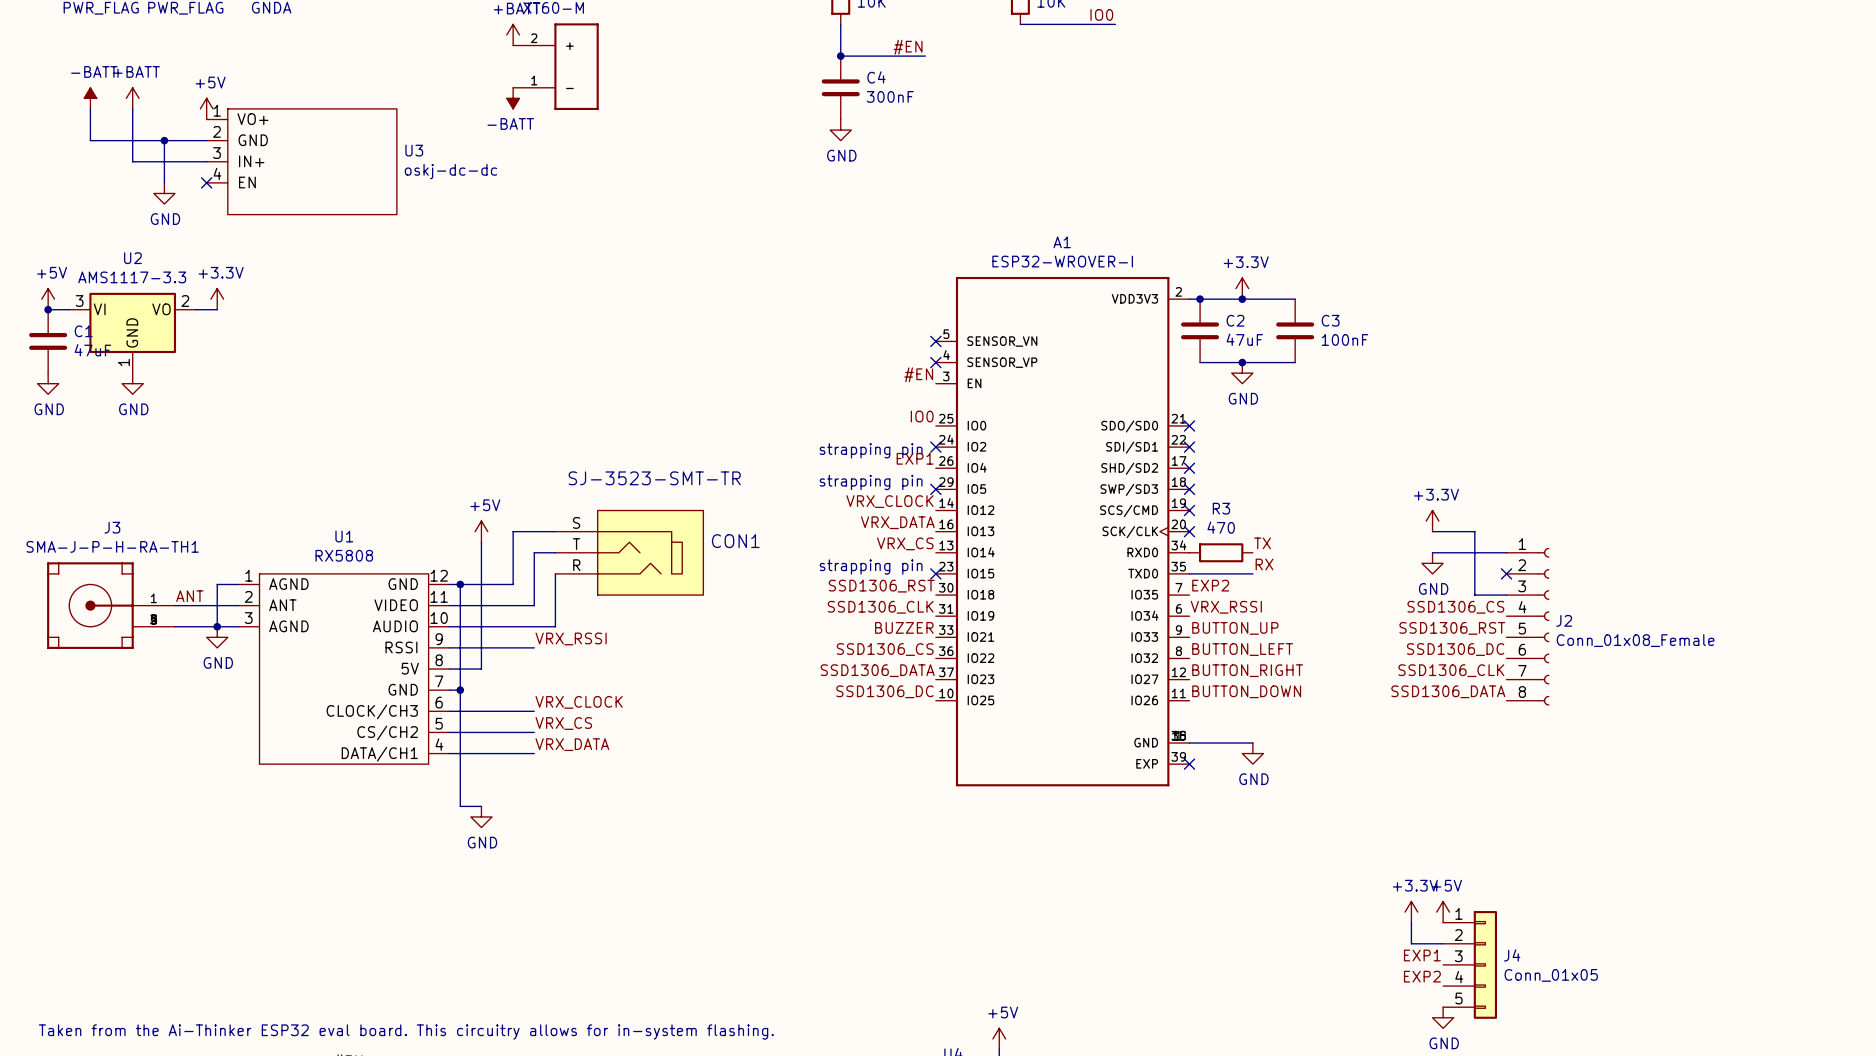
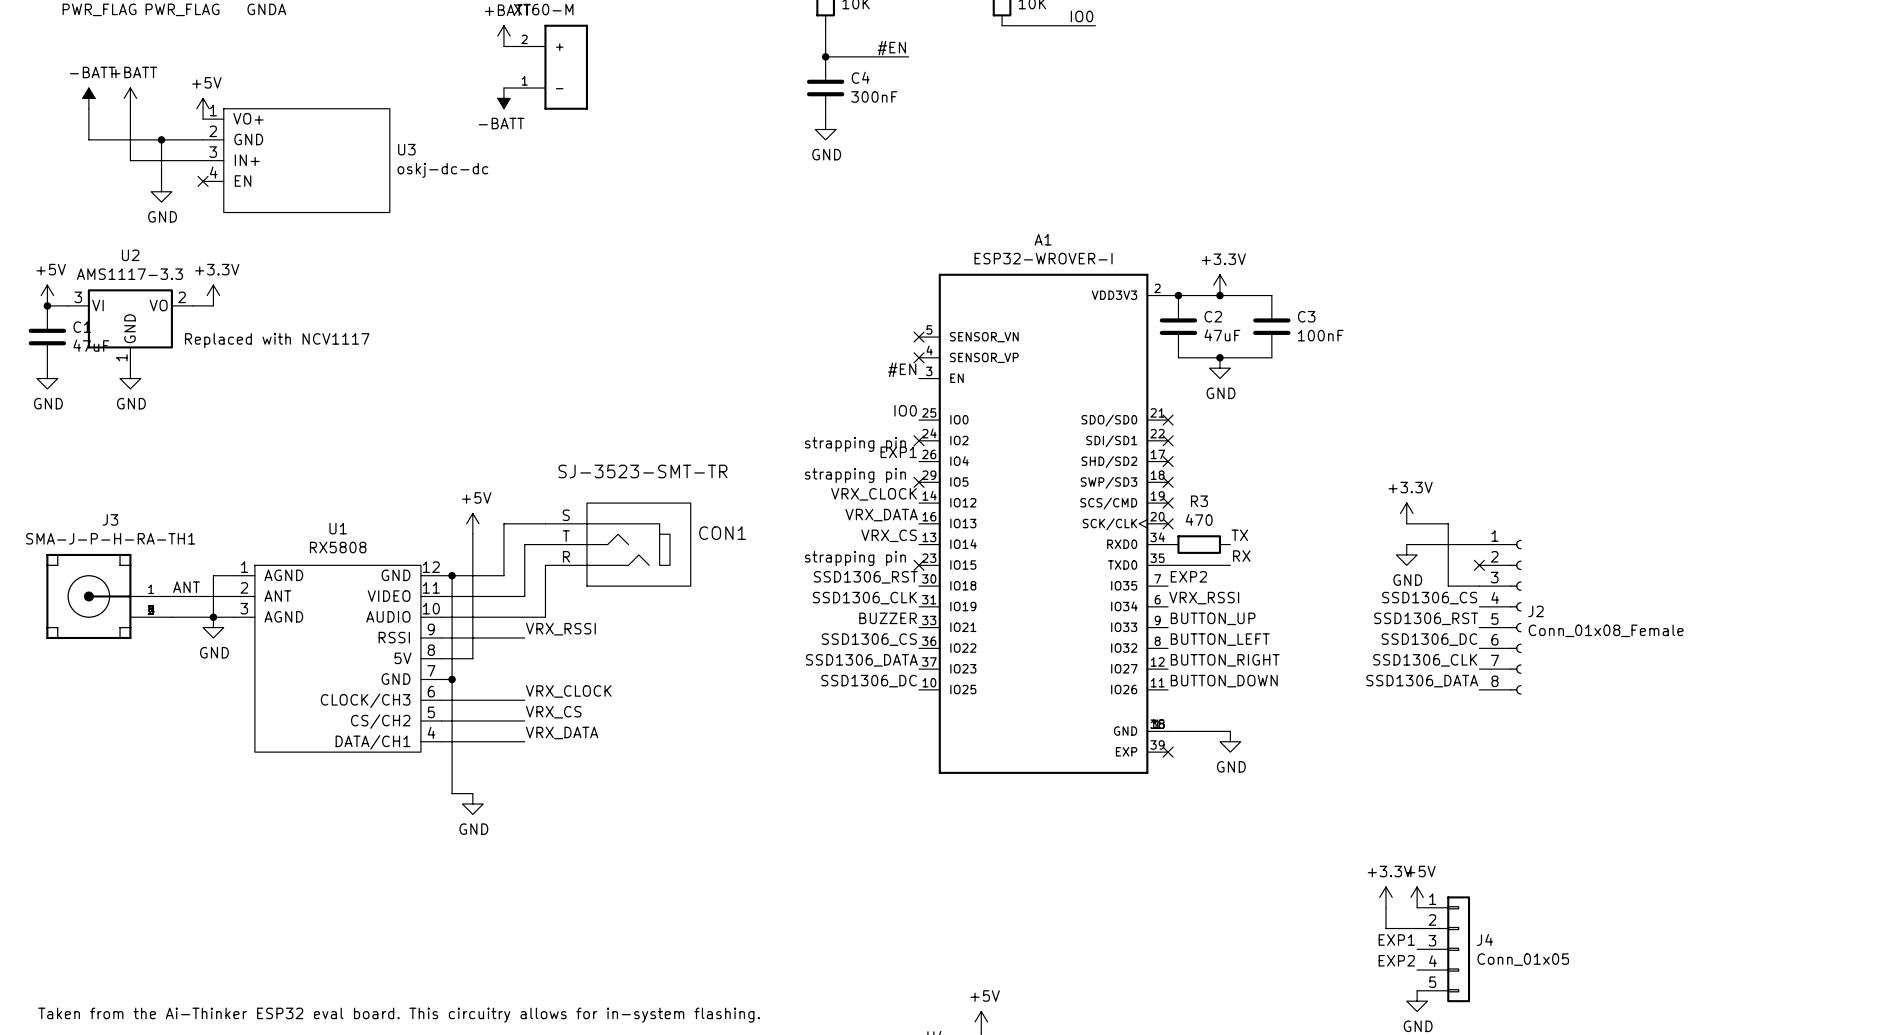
text: none -> Replaced with NCV1117 (277, 340)

